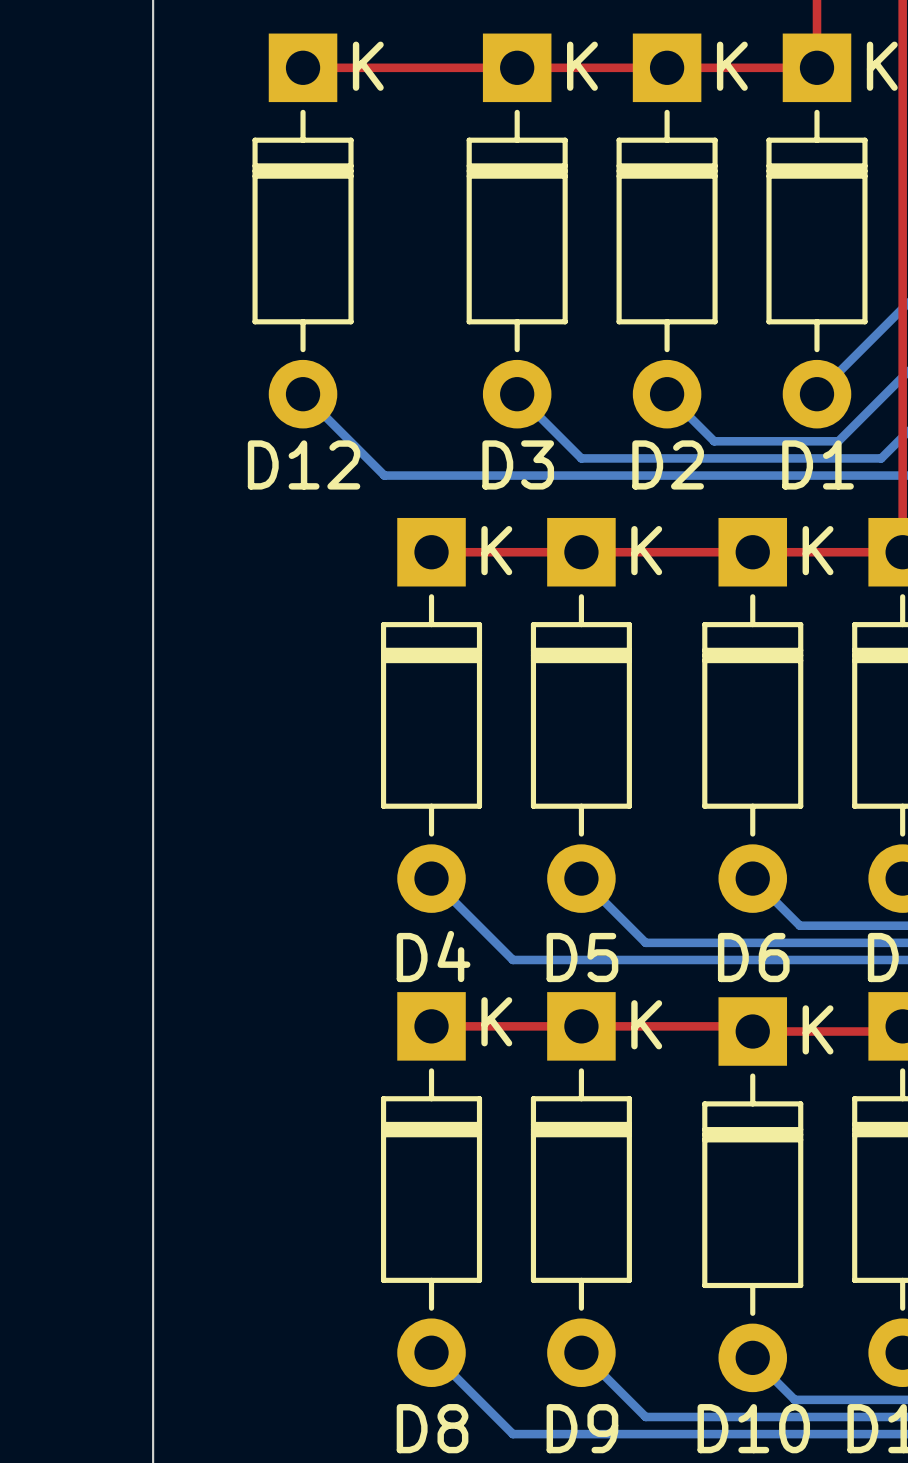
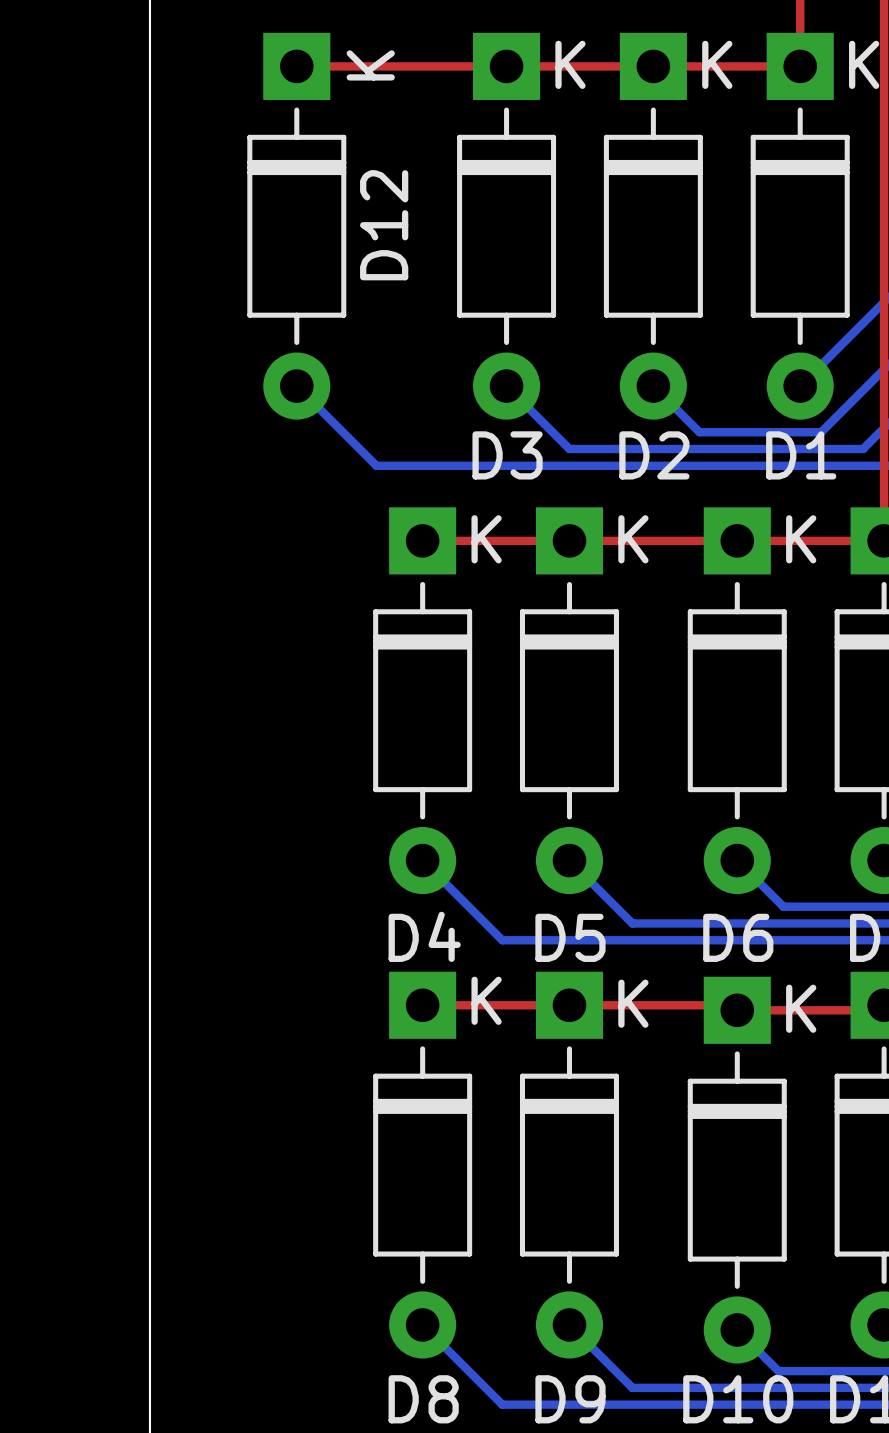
D12 text rotation: 0° (368, 66) -> 90° counterclockwise (370, 65)
D12 name rotation: 0° (304, 464) -> 90° counterclockwise (384, 225)
D12 name position: D12 (304, 464) -> D12 (384, 225)

